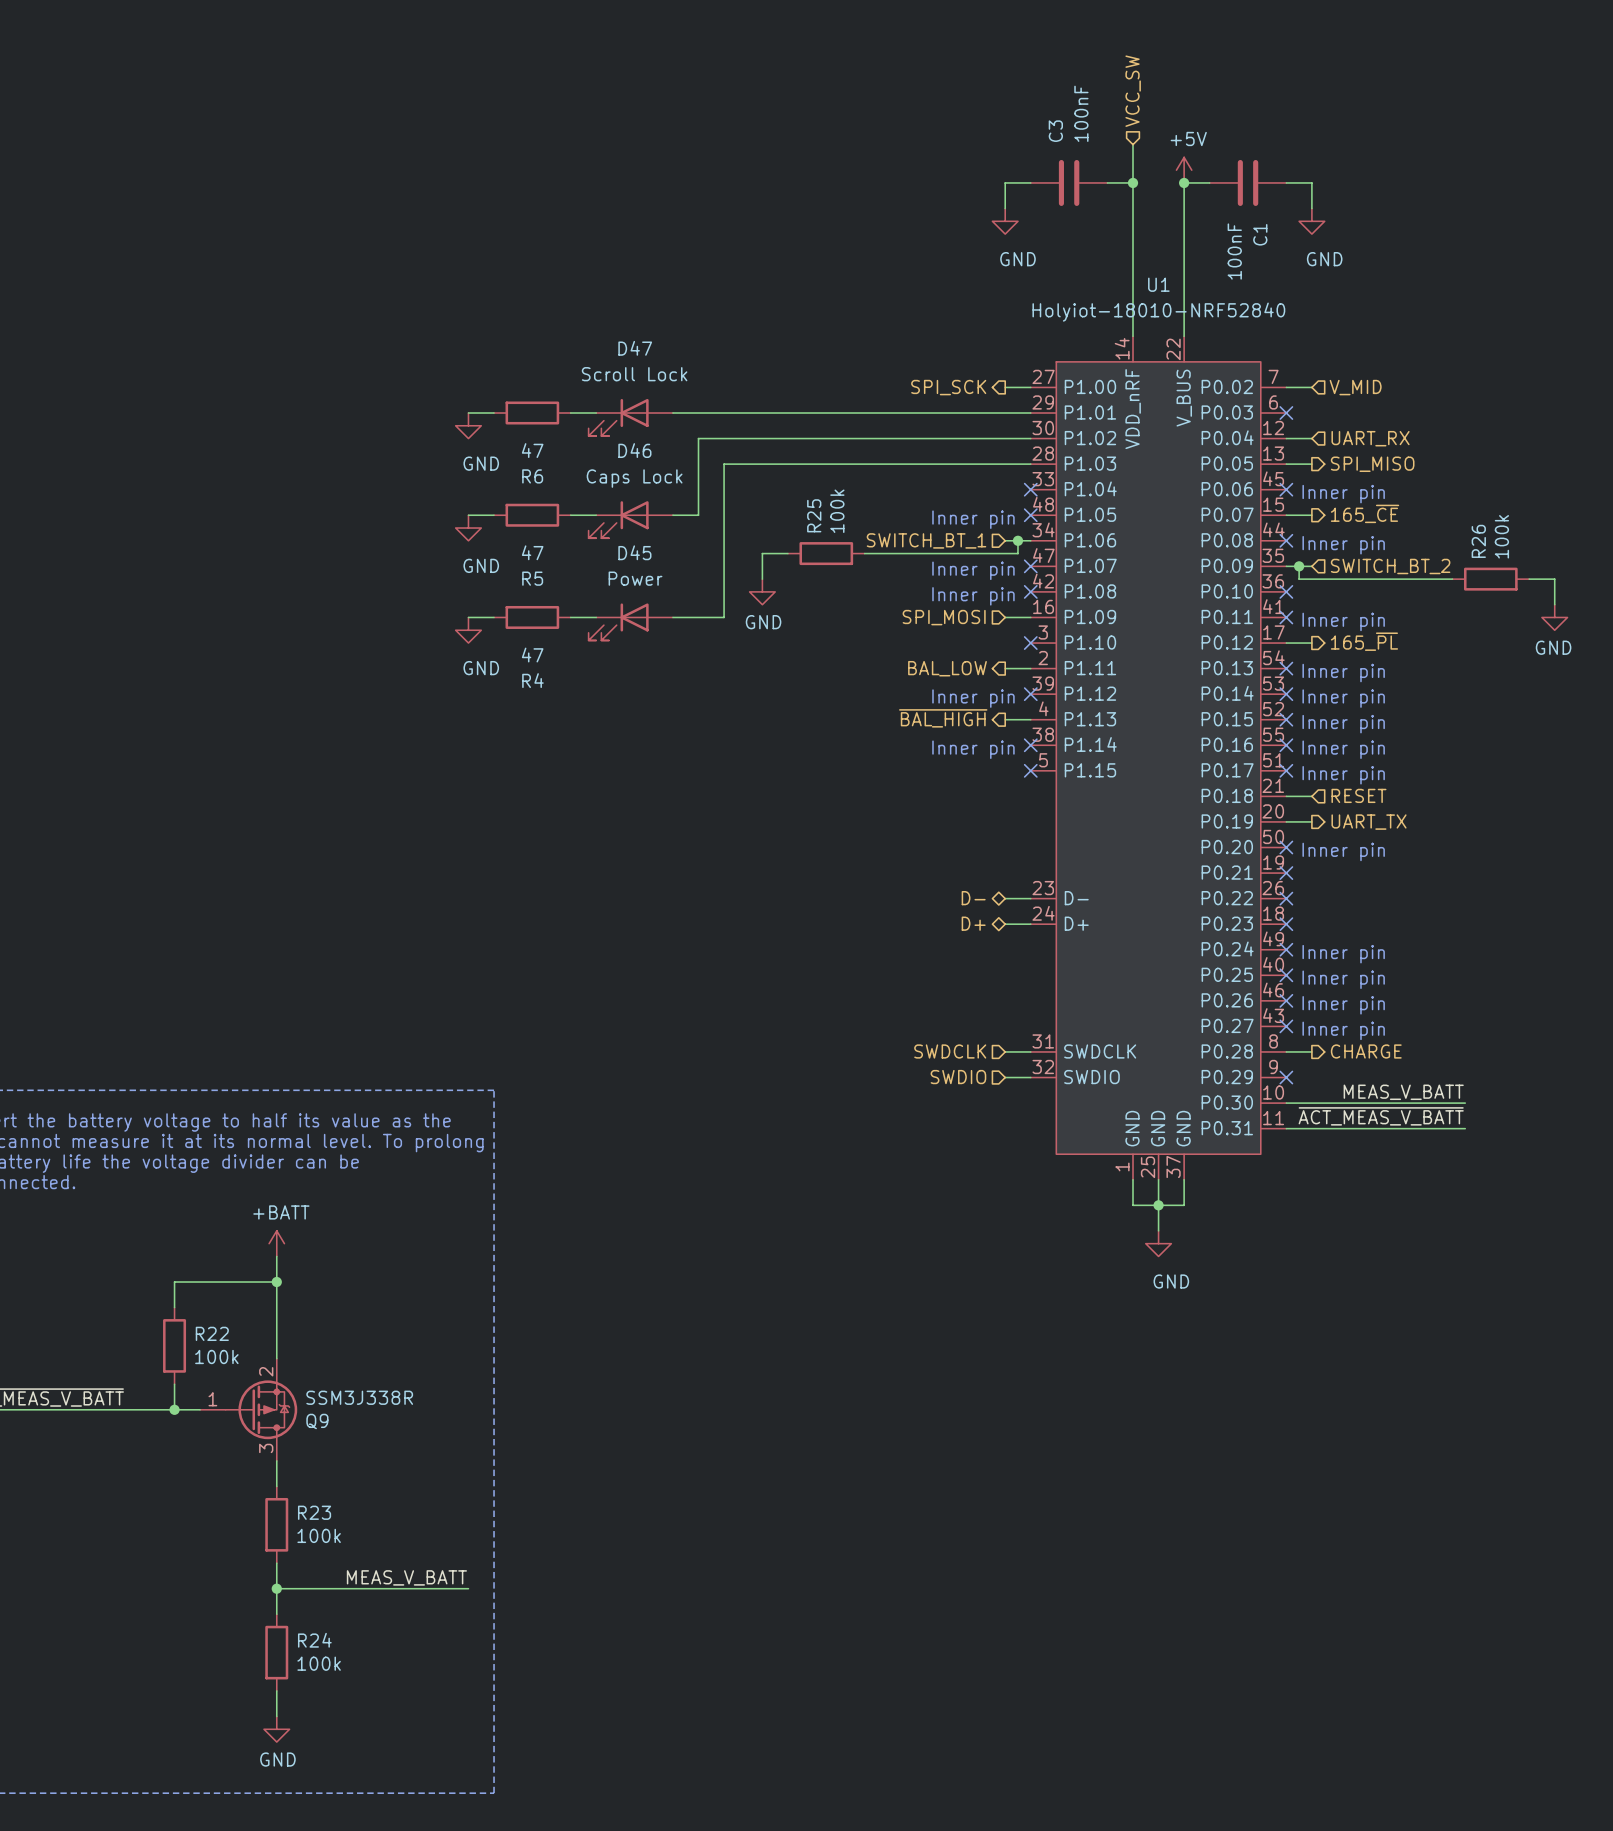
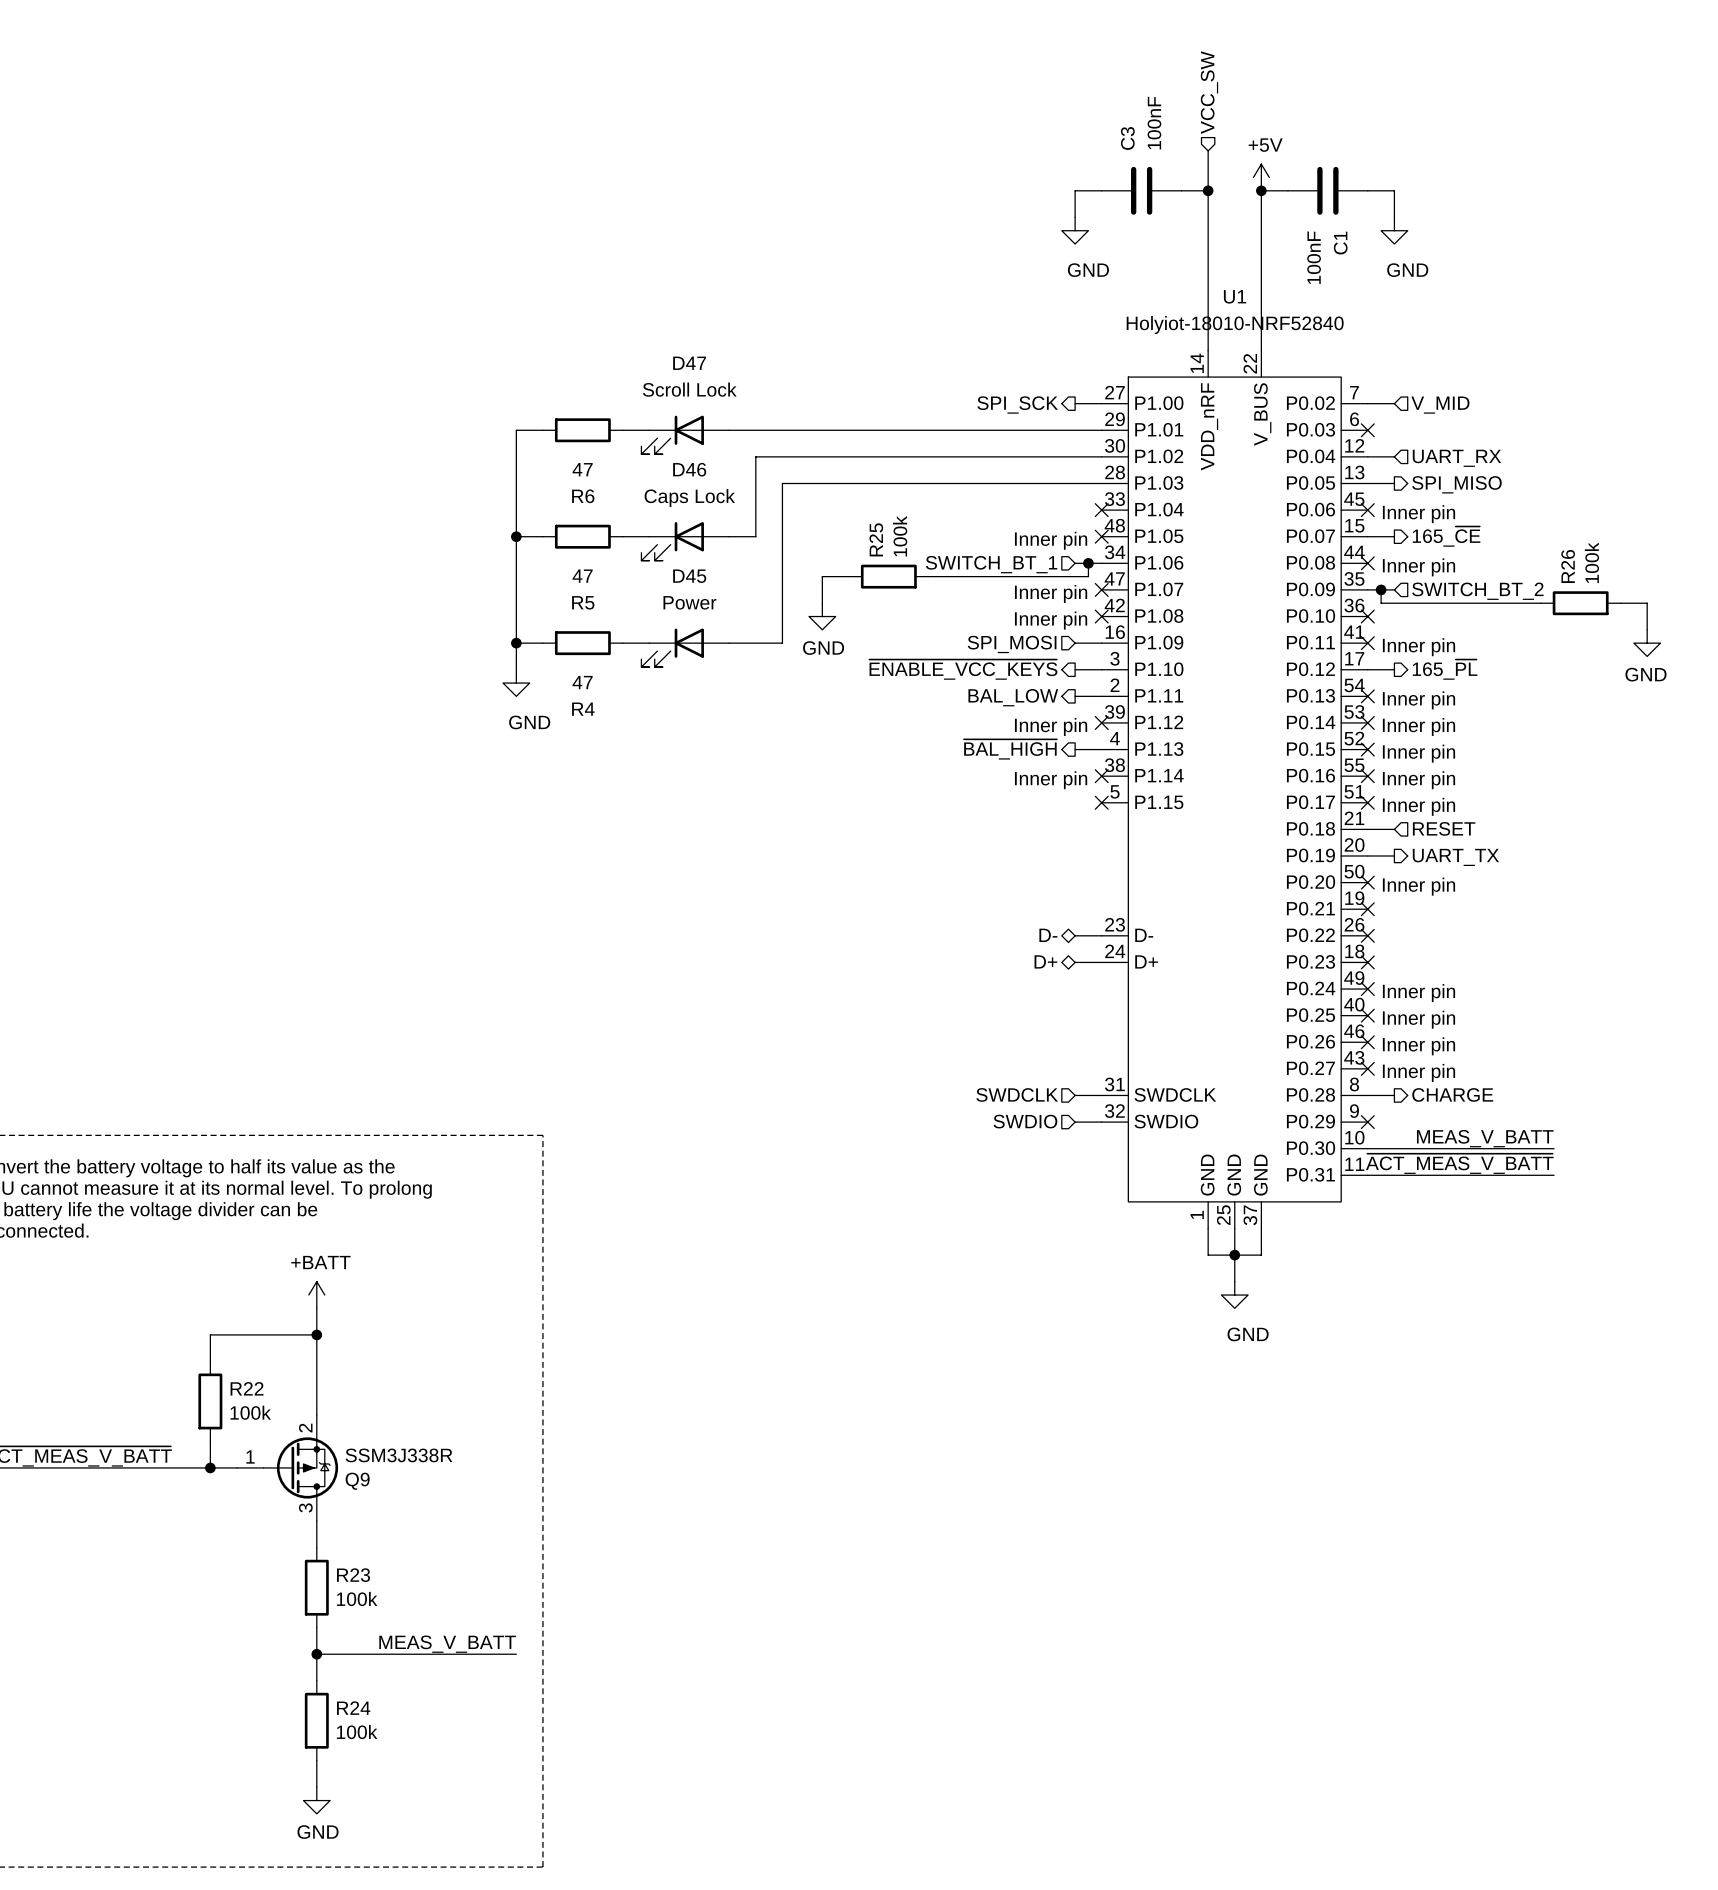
wire: none -> (516, 430) (516, 669)
power symbol: GND (468, 425) -> none
junction: none -> (516, 536)
power symbol: GND (468, 528) -> none
junction: none -> (516, 643)
power symbol position: GND (468, 630) -> GND (516, 683)
hierarchical label: none -> ~{ENABLE_VCC_KEYS} (963, 669)
wire: none -> (1075, 669) (1101, 669)
no-connect mark: (1030, 643) -> none

